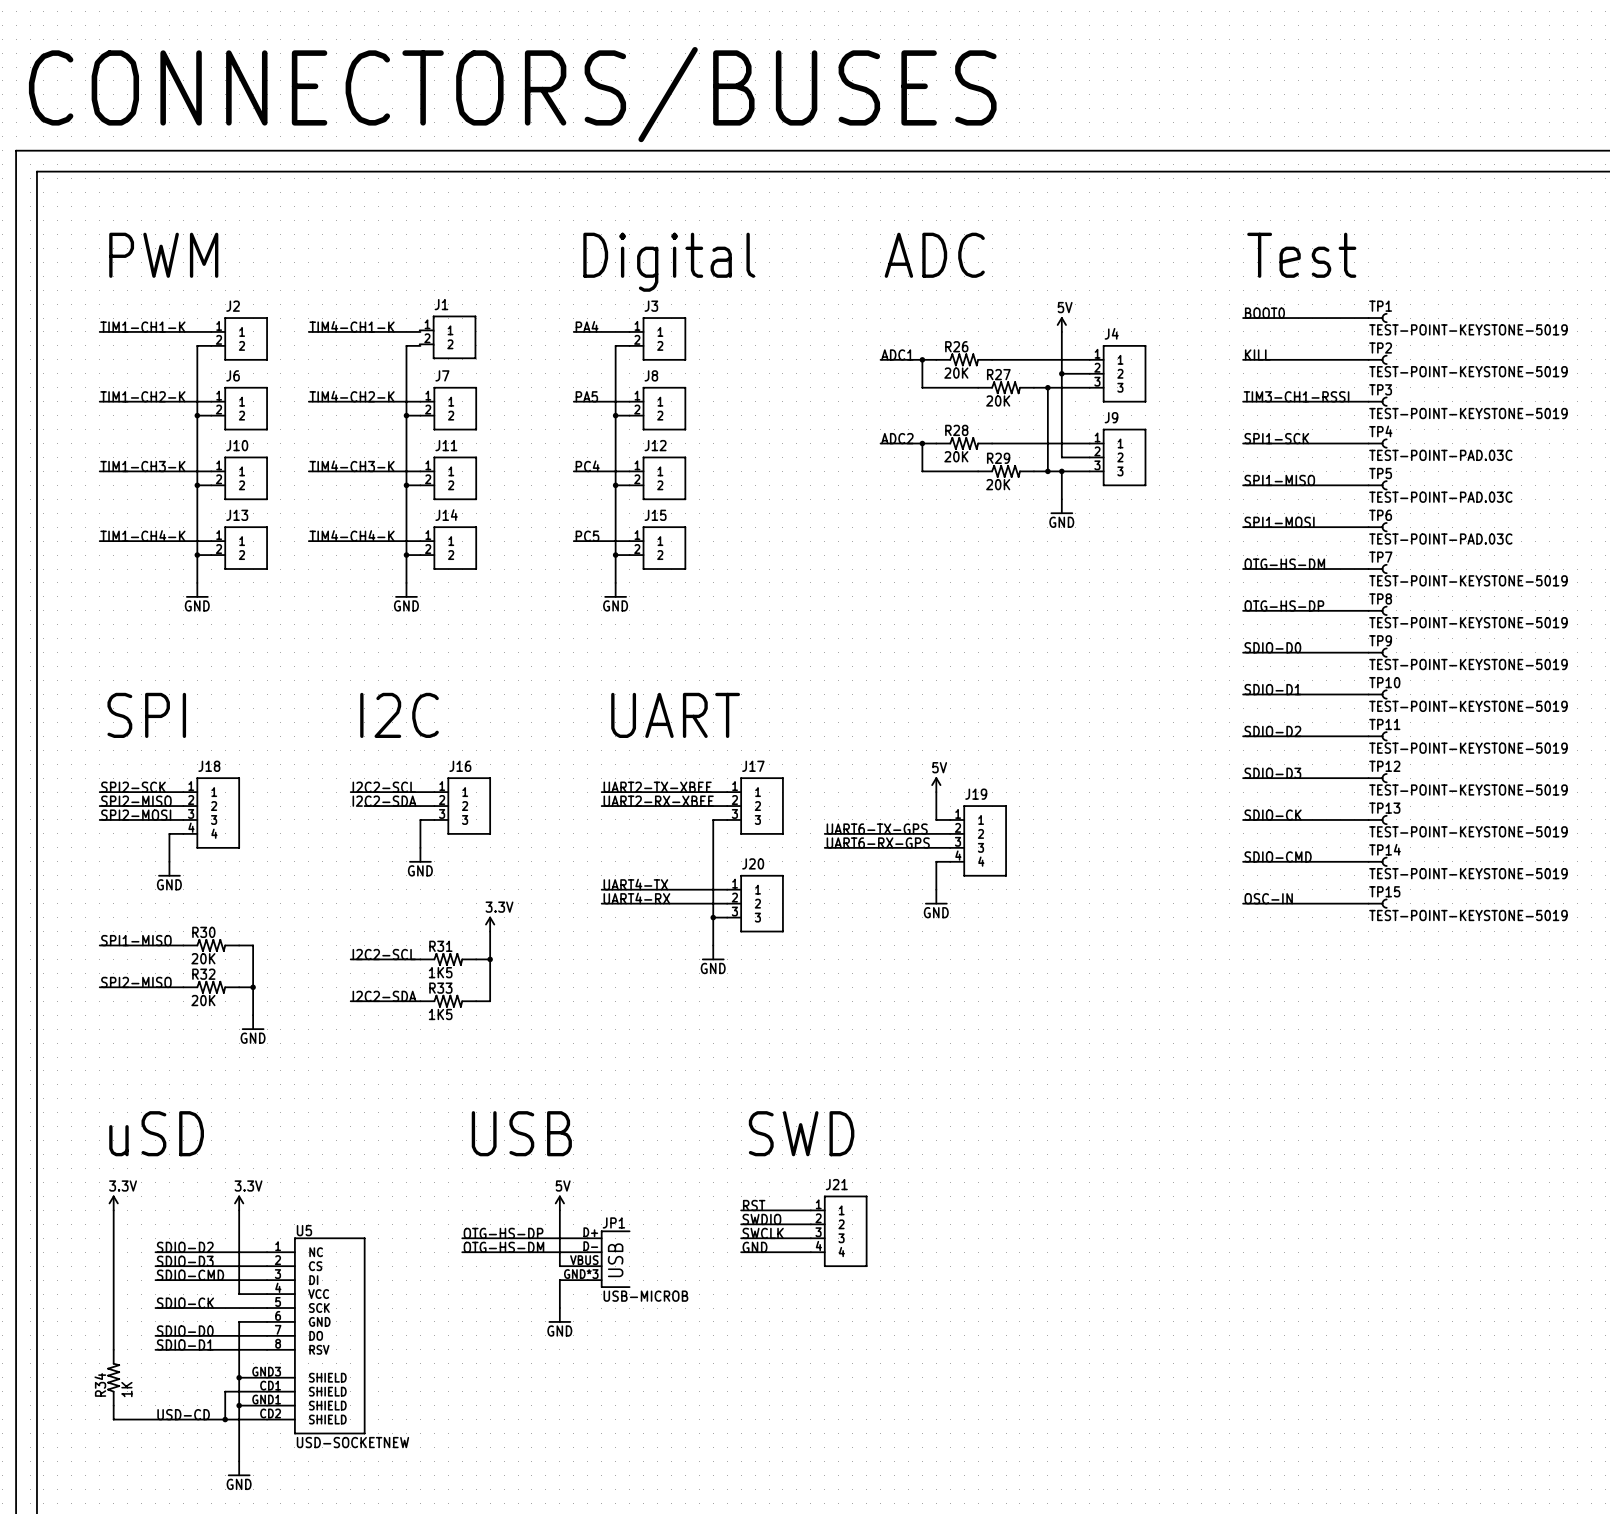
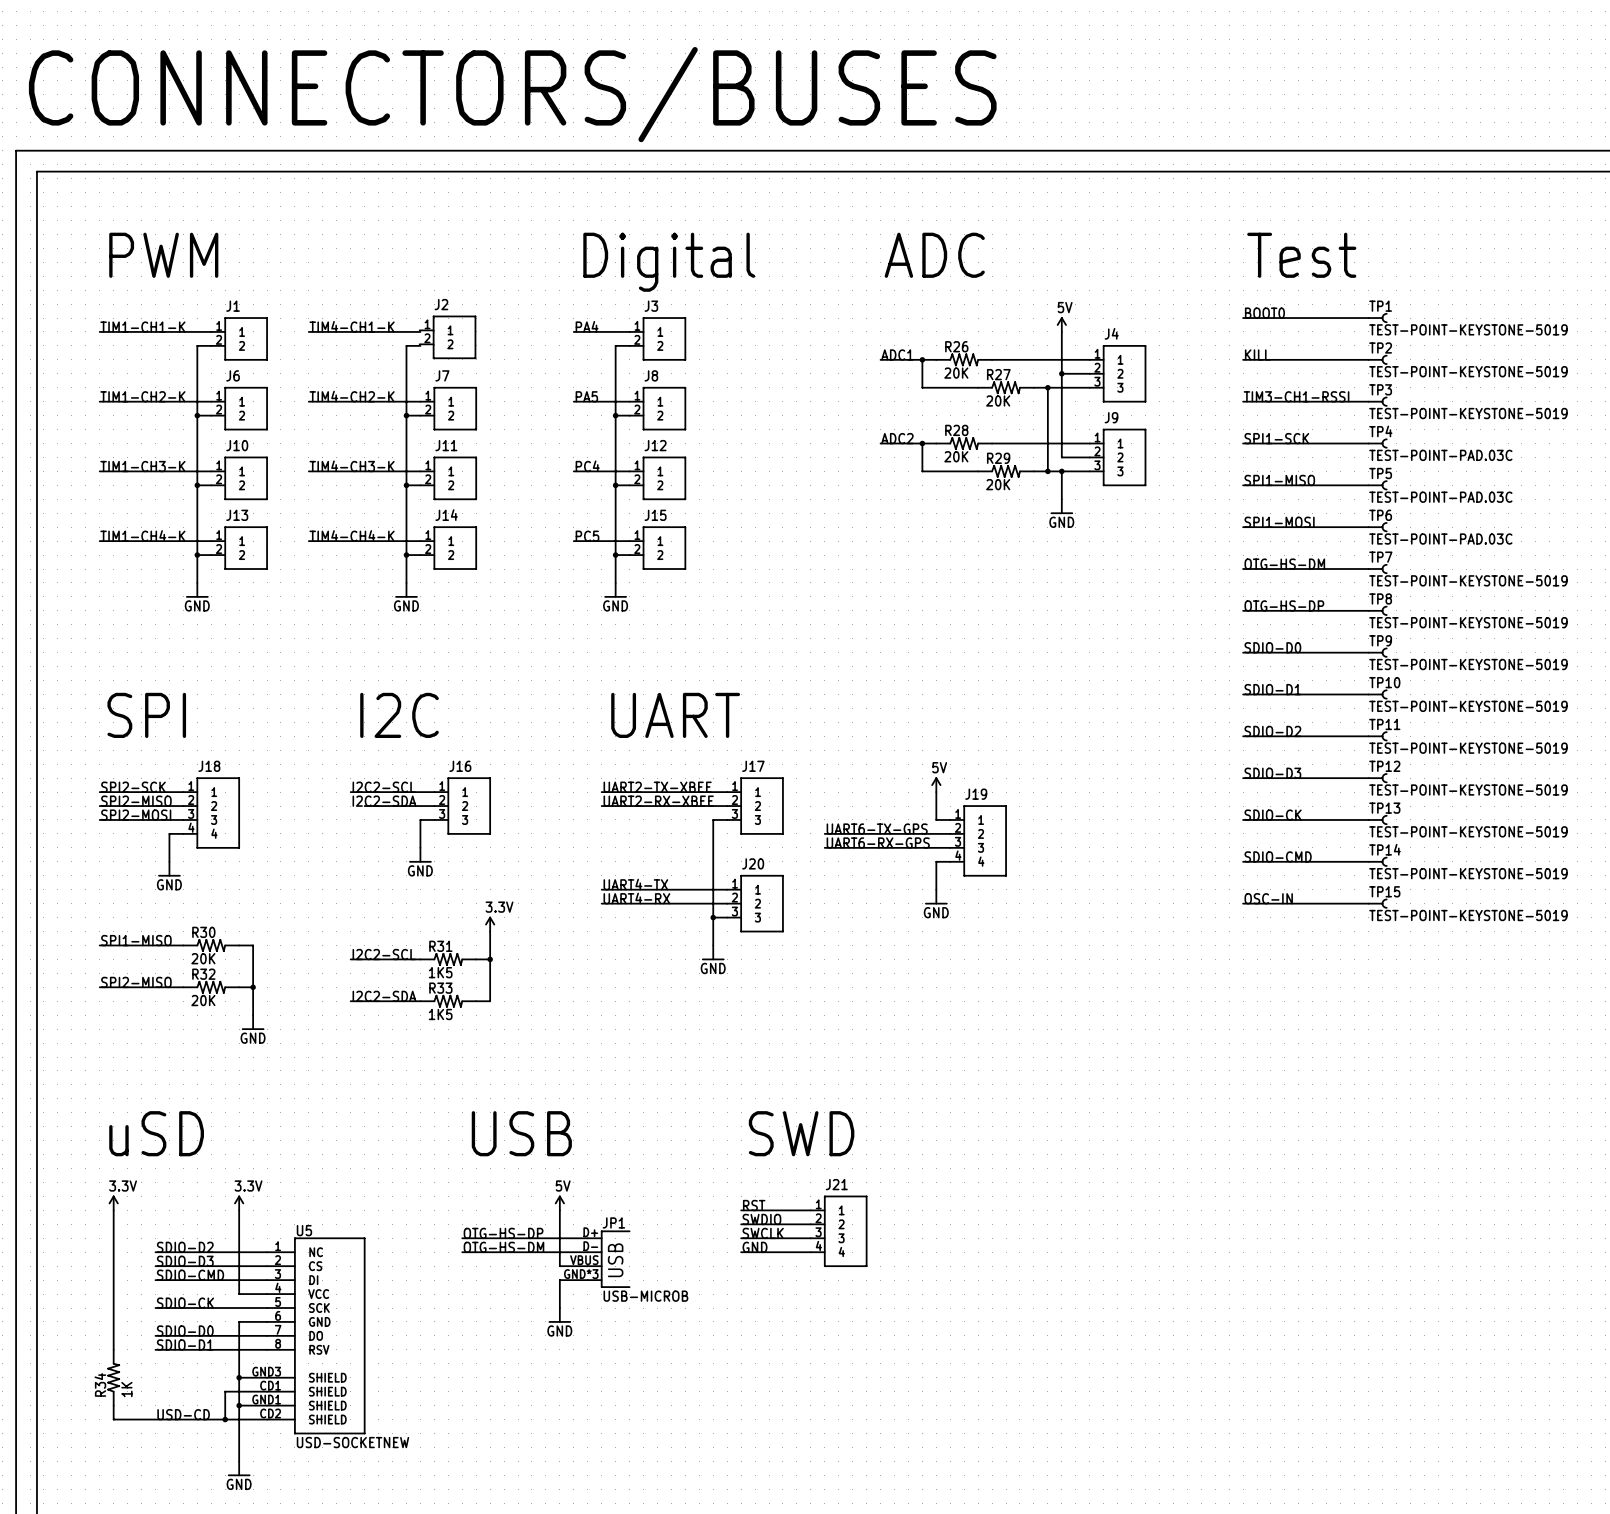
J1 name: J1 (441, 304) -> J2 (441, 304)
J2 name: J2 (233, 306) -> J1 (233, 306)

